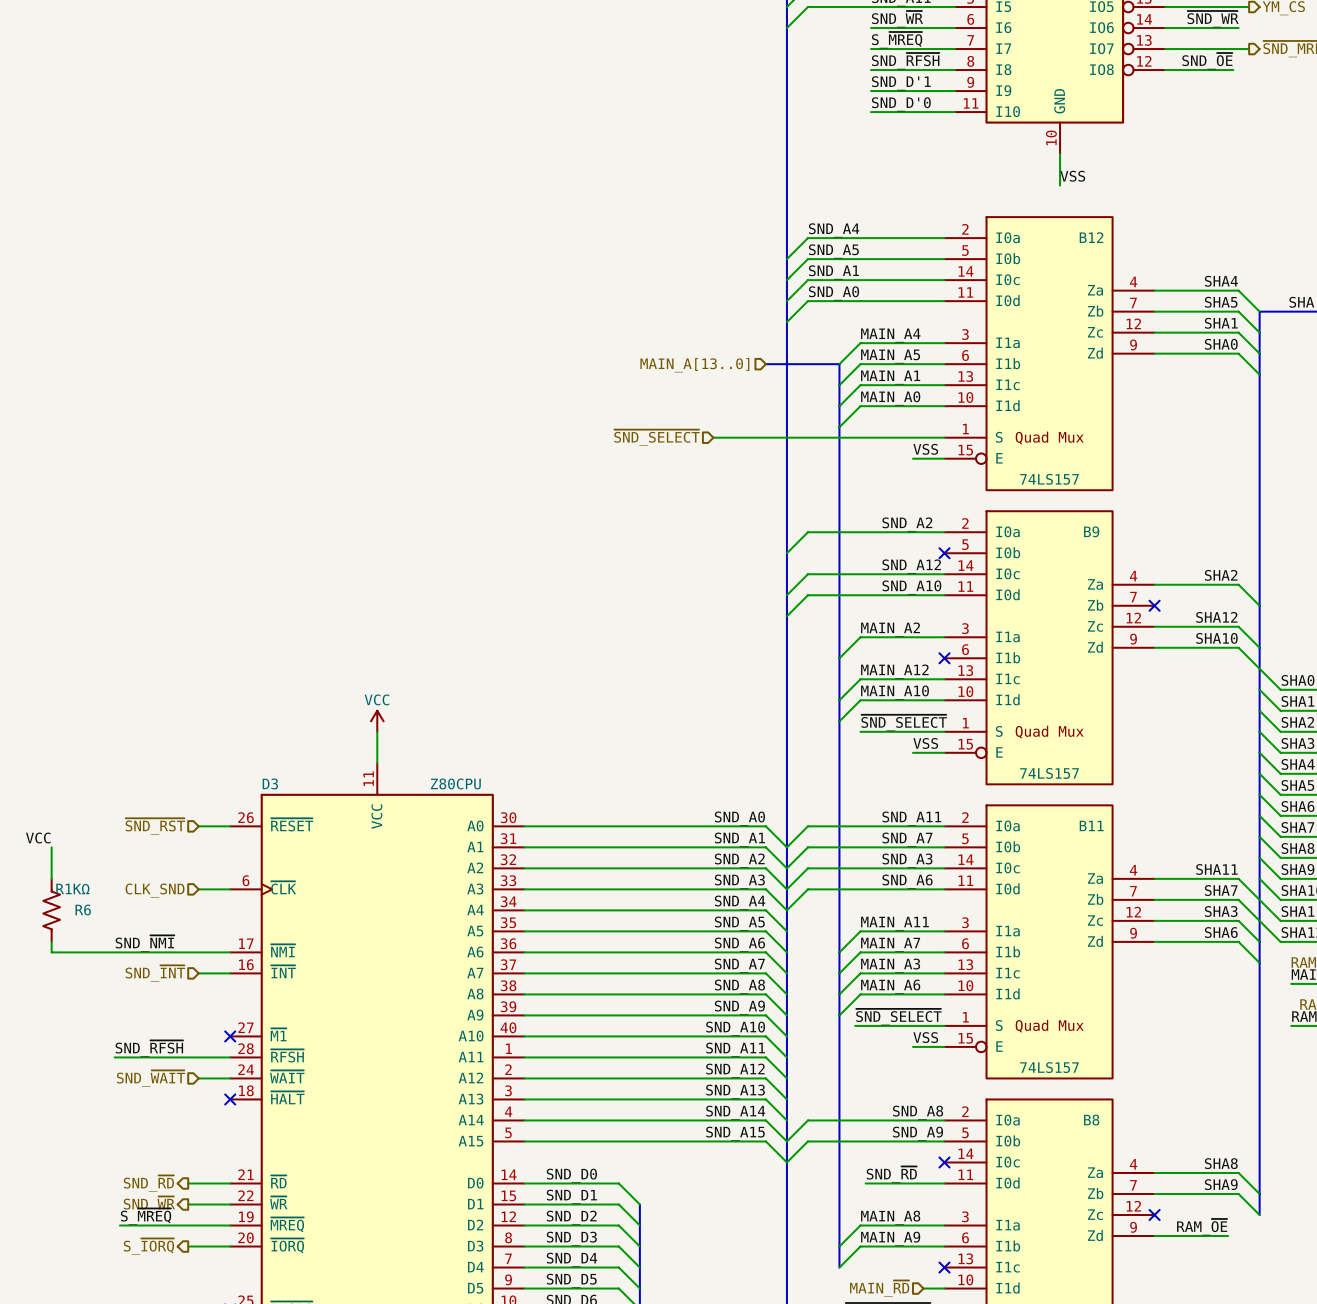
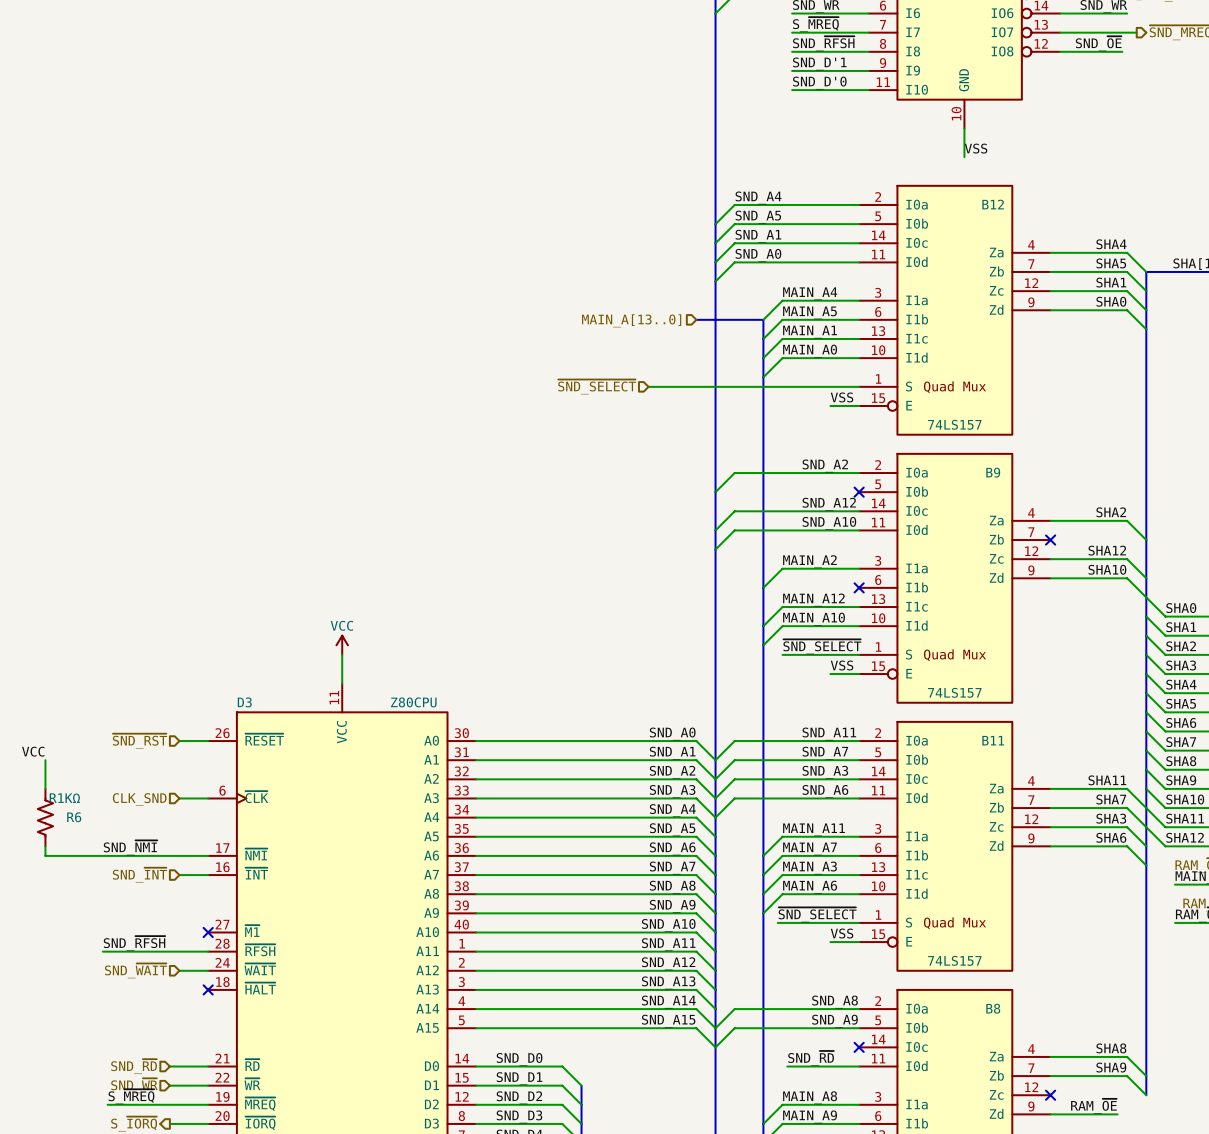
hierarchical label shape: output (148, 1183) -> input (134, 1066)
hierarchical label shape: output (149, 1204) -> input (134, 1085)

